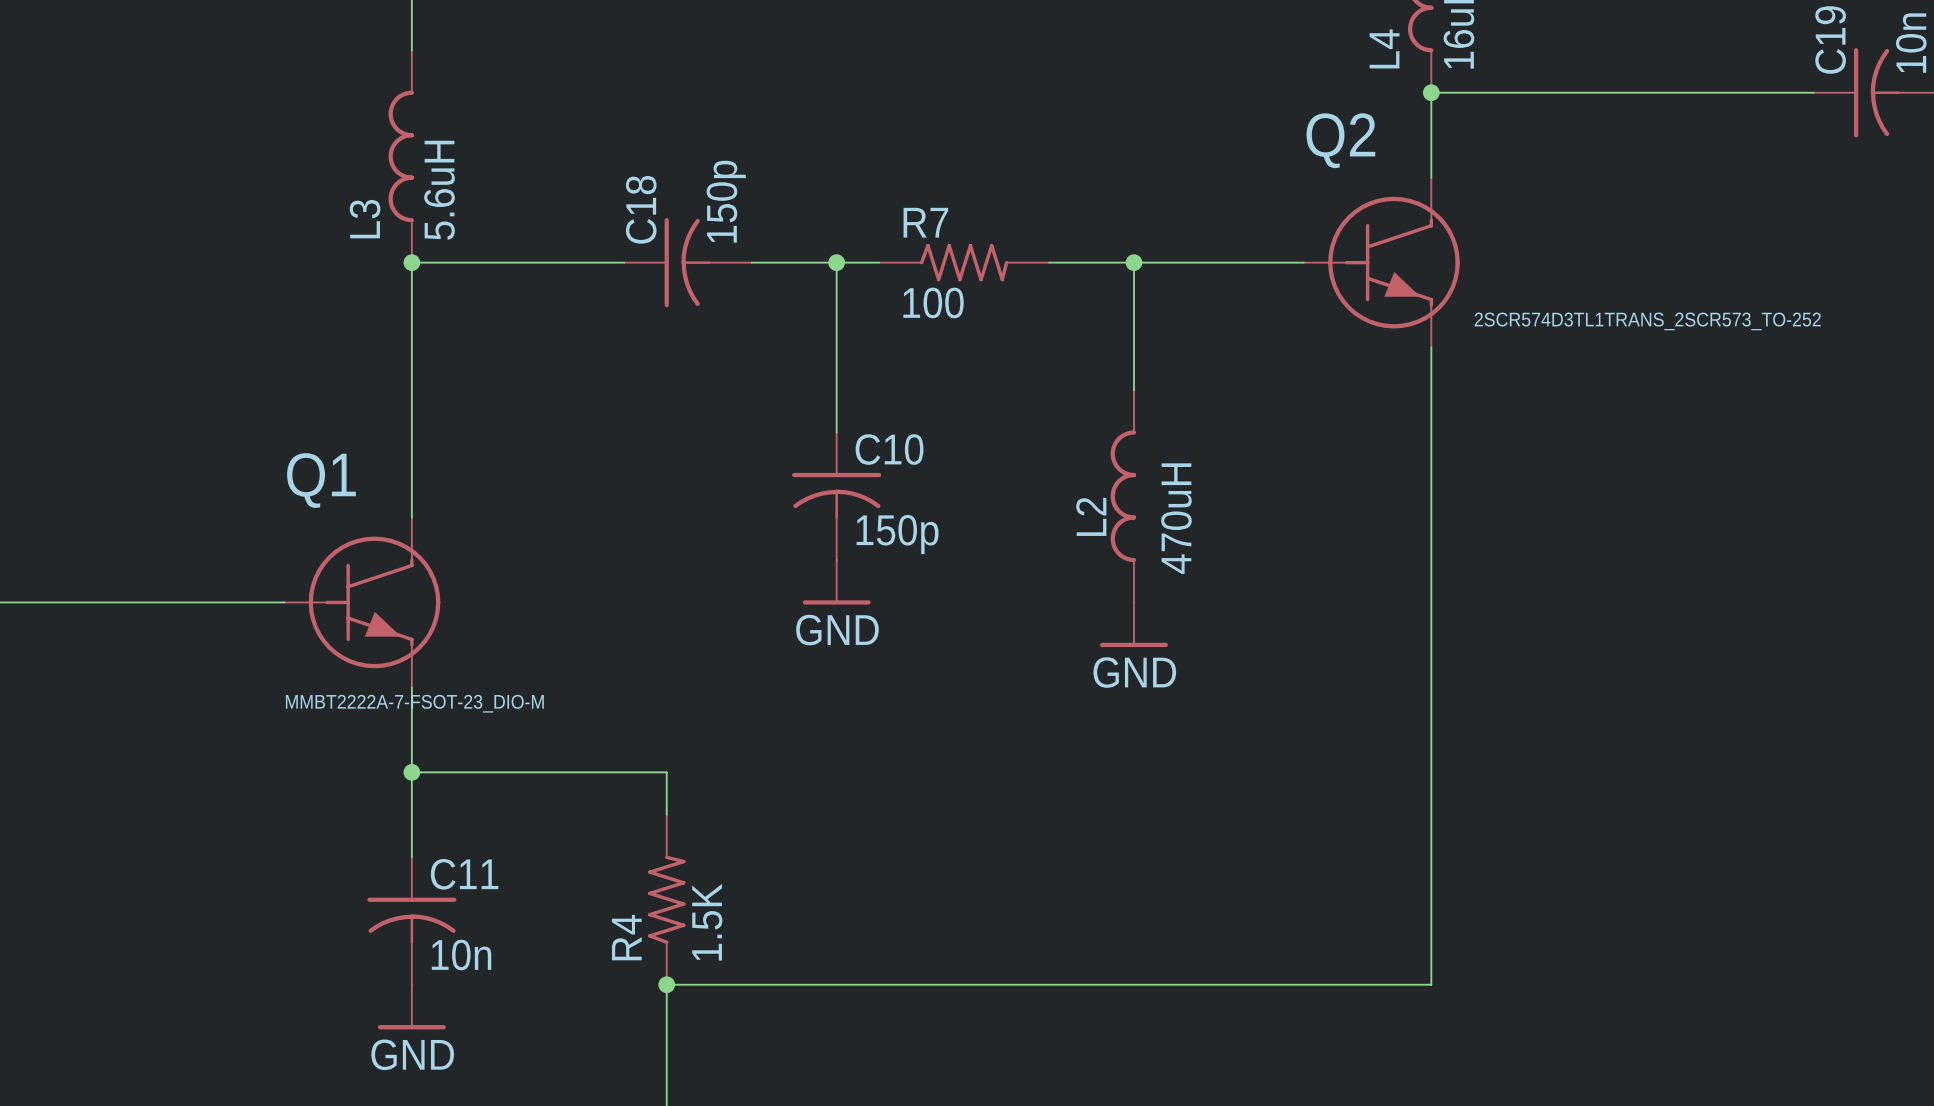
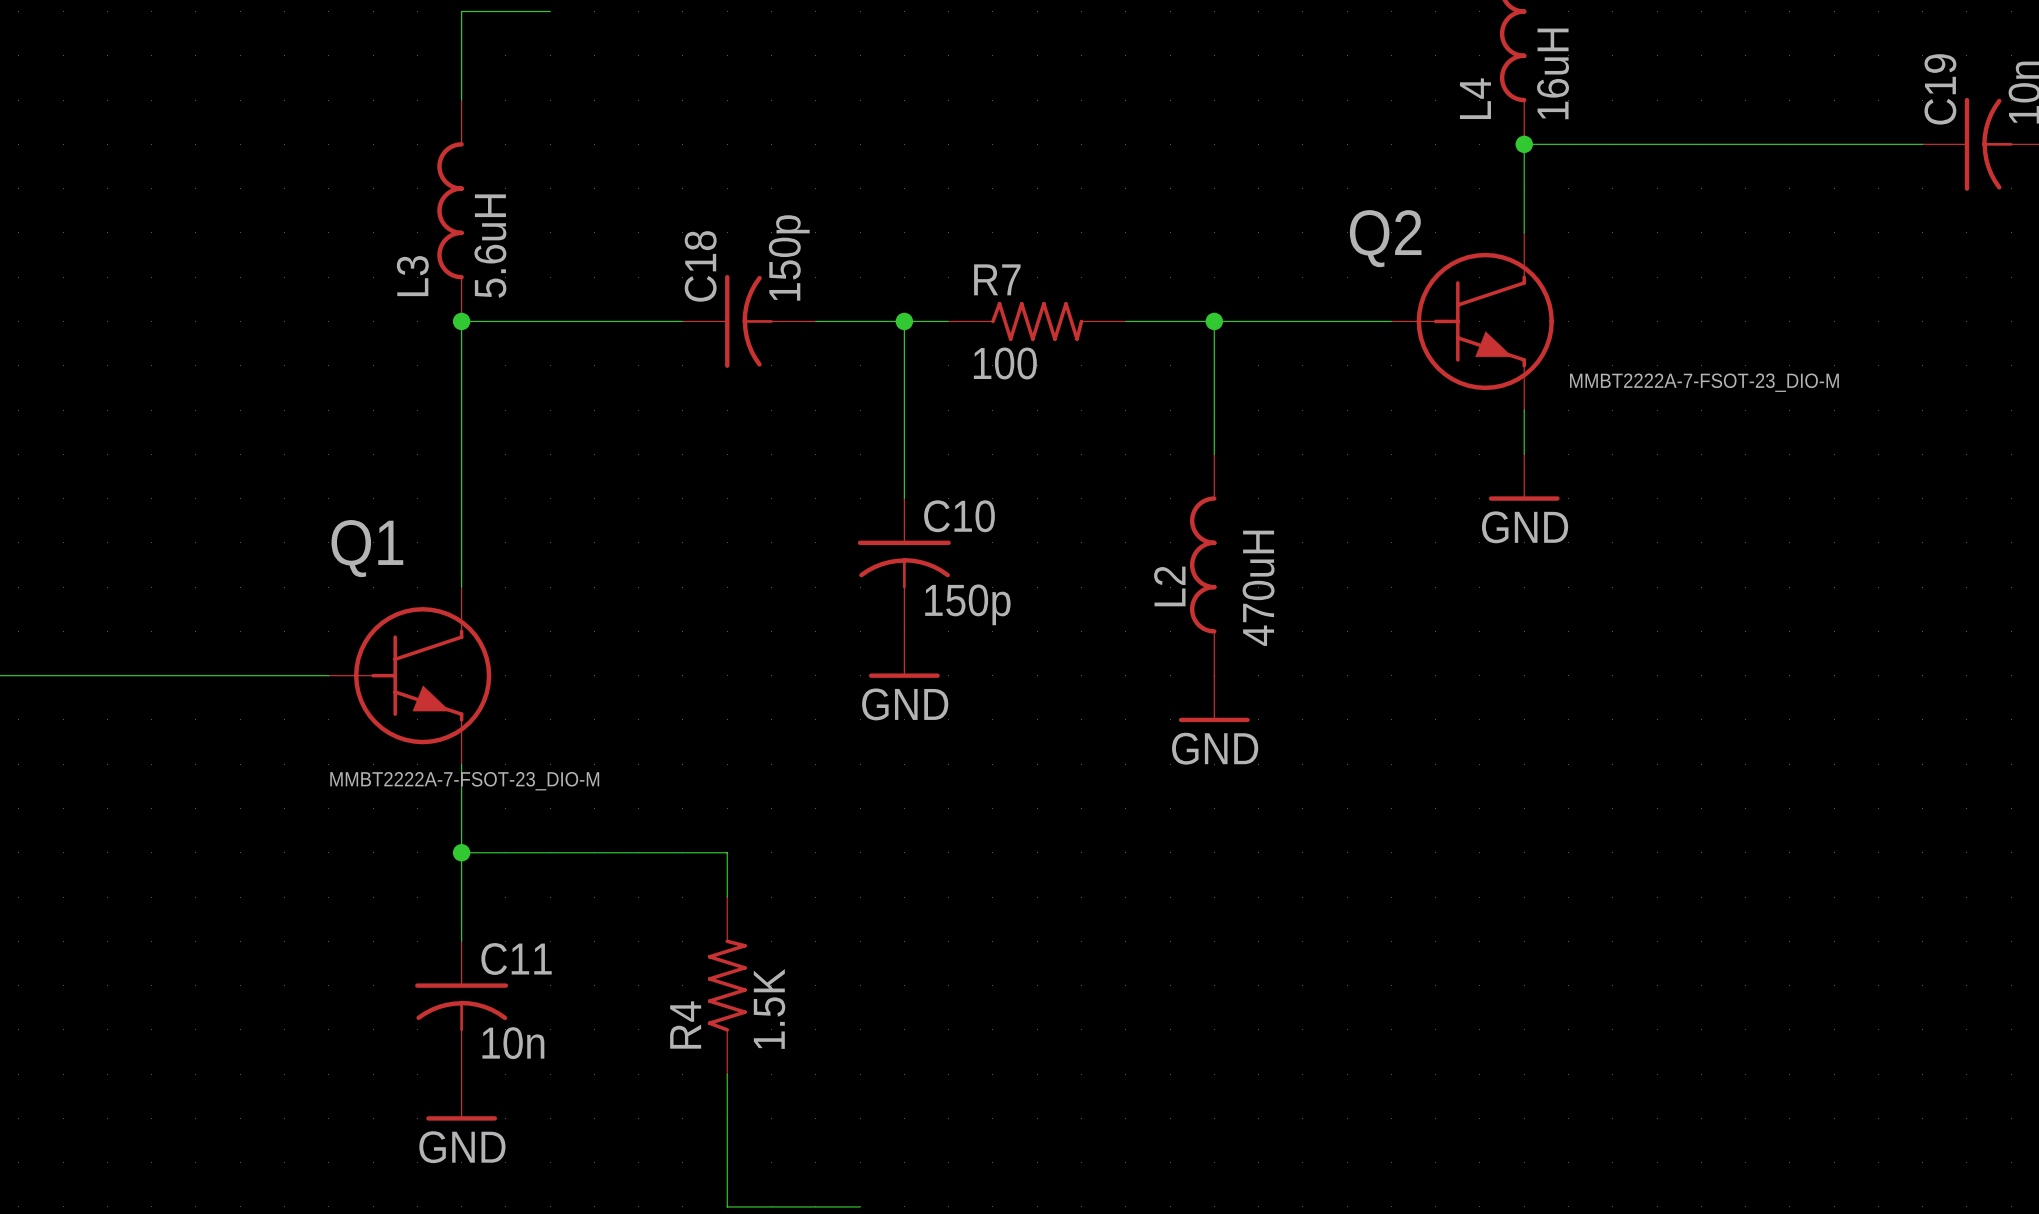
Q2 name position: Q2 (1340, 140) -> Q2 (1385, 238)
Q2 value: 2SCR574D3TL1TRANS_2SCR573_TO-252 (1647, 321) -> MMBT2222A-7-FSOT-23_DIO-M (1704, 382)
wire: (1431, 390) (1431, 984) (666, 984) -> none
power symbol: none -> GND (1524, 477)
junction: (666, 984) -> none

